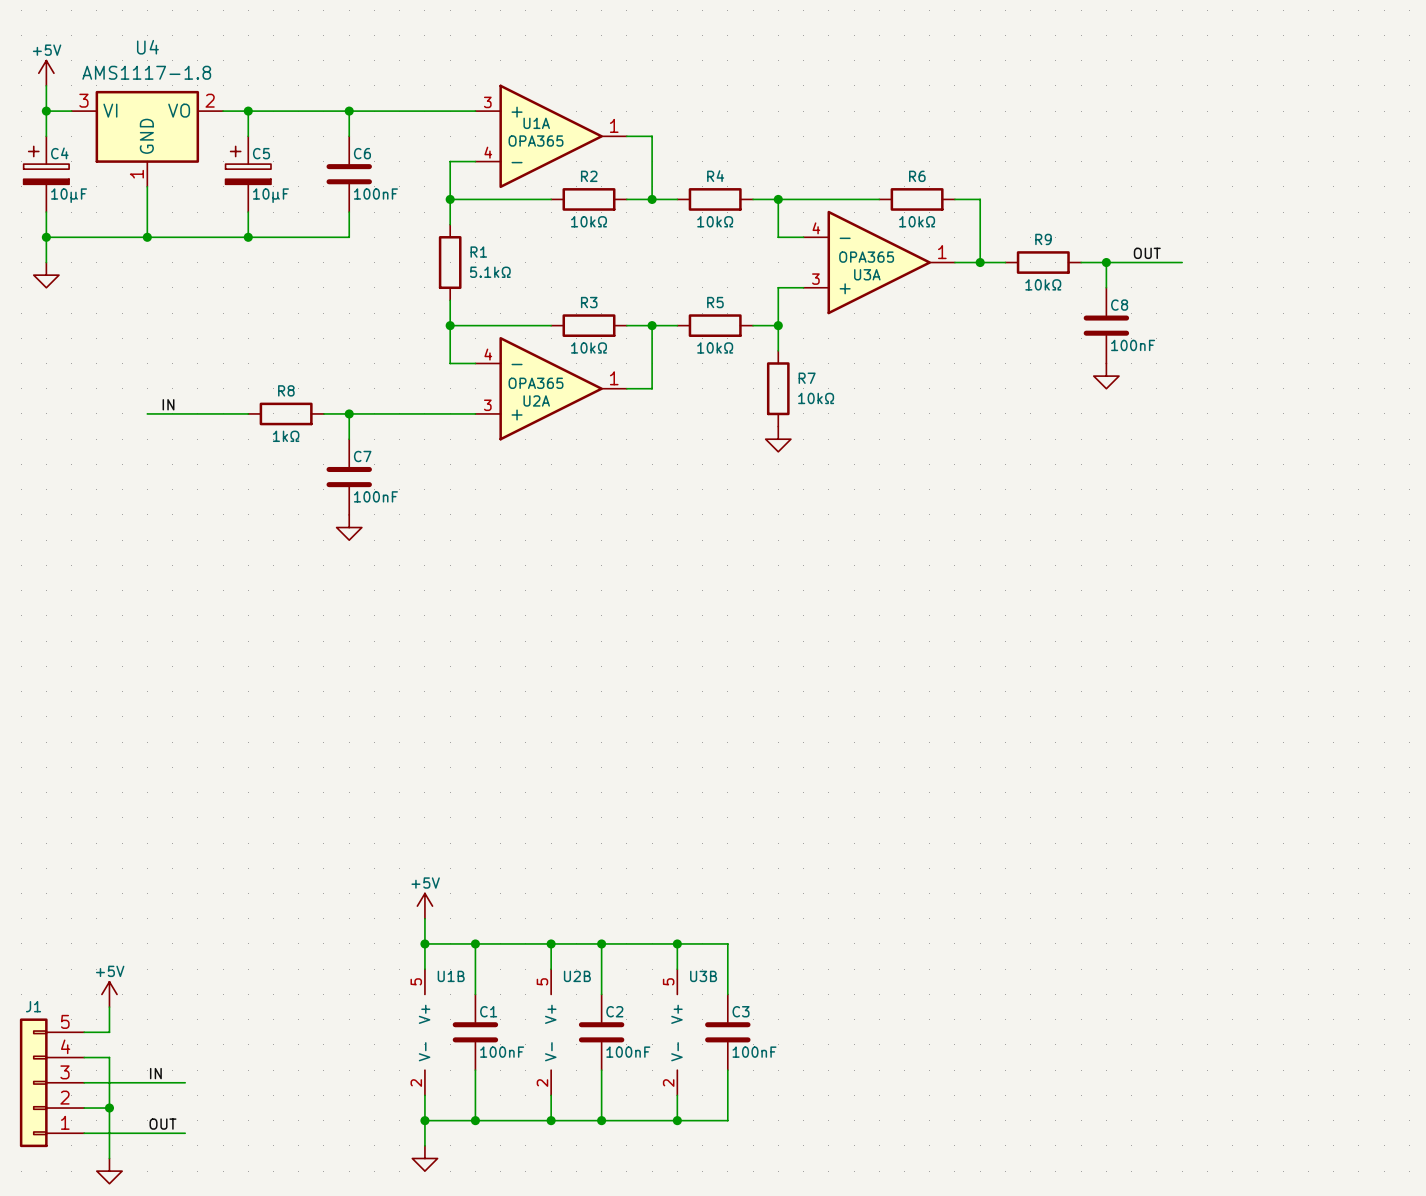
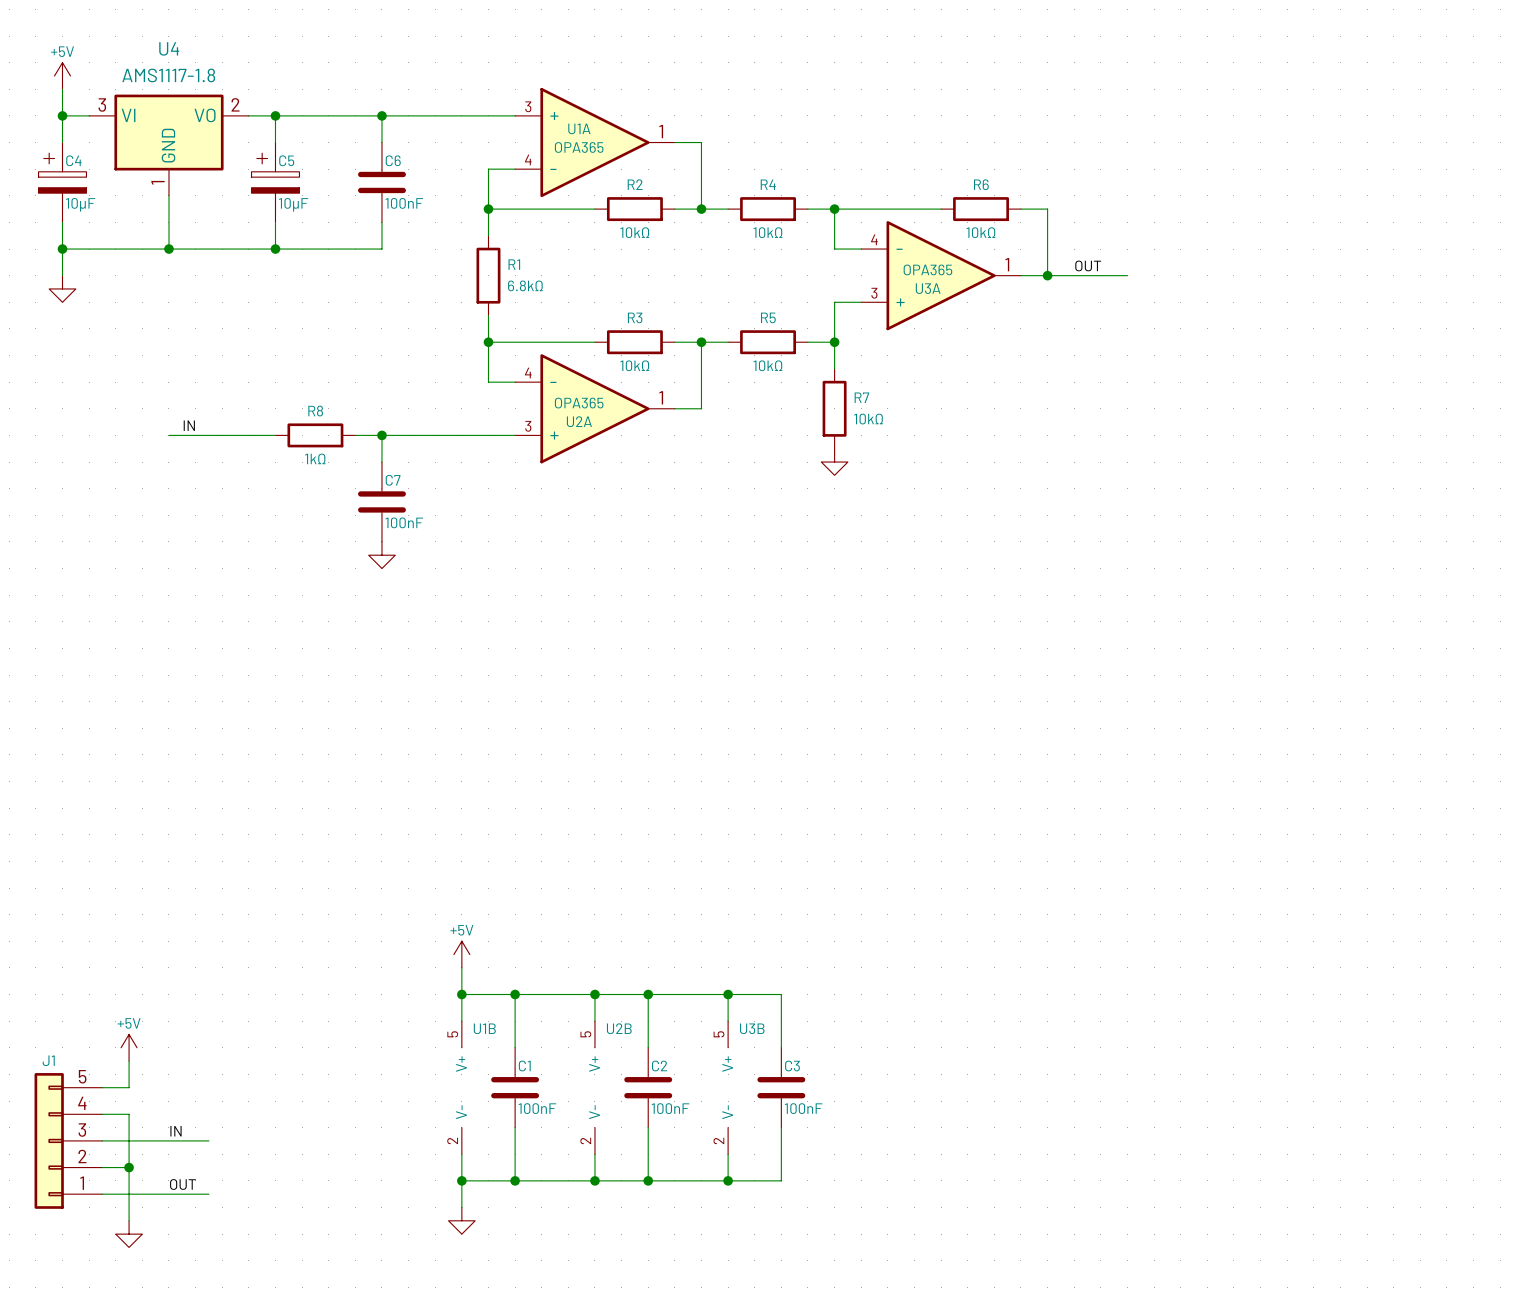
label position: OUT (1147, 253) -> OUT (1088, 265)
wire: none -> (1074, 275) (1127, 275)
R9: 10kΩ (1043, 262) -> none
wire: (1081, 262) (1182, 262) -> none
wire: (1106, 262) (1106, 287) -> none
junction: (1106, 262) -> none
R1 value: 5.1kΩ (490, 272) -> 6.8kΩ (525, 285)
C8: 100nF (1106, 325) -> none
power symbol: (1106, 376) -> none

